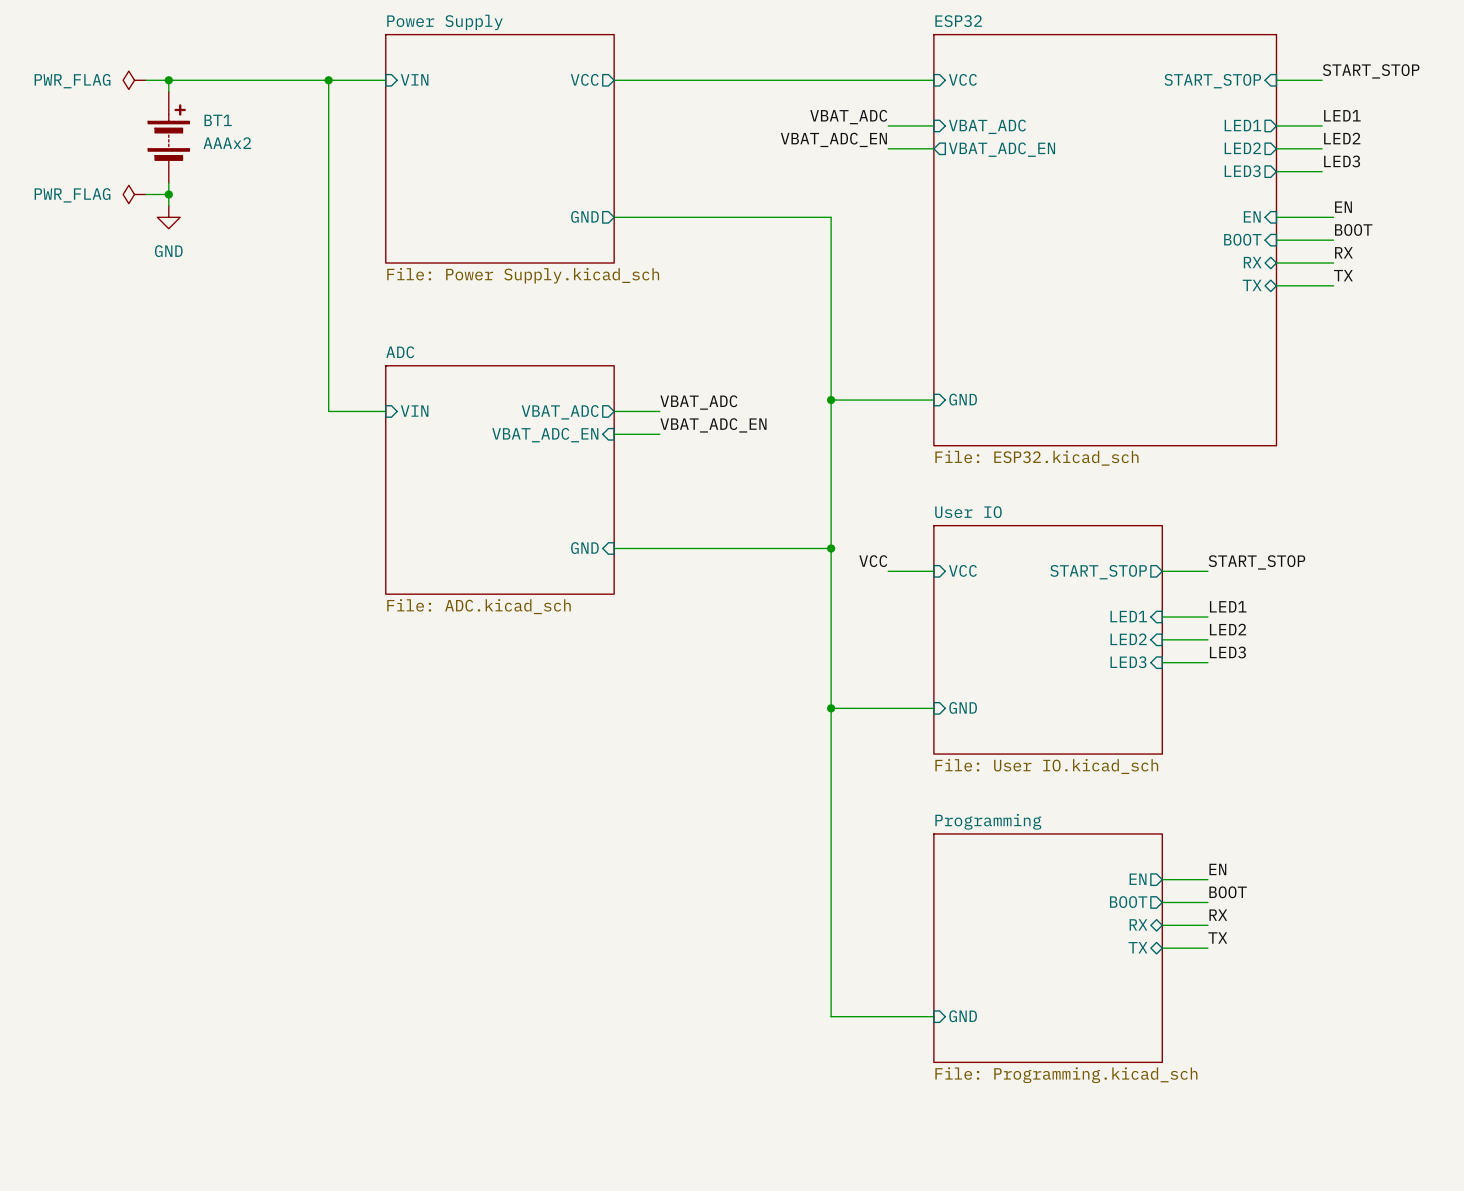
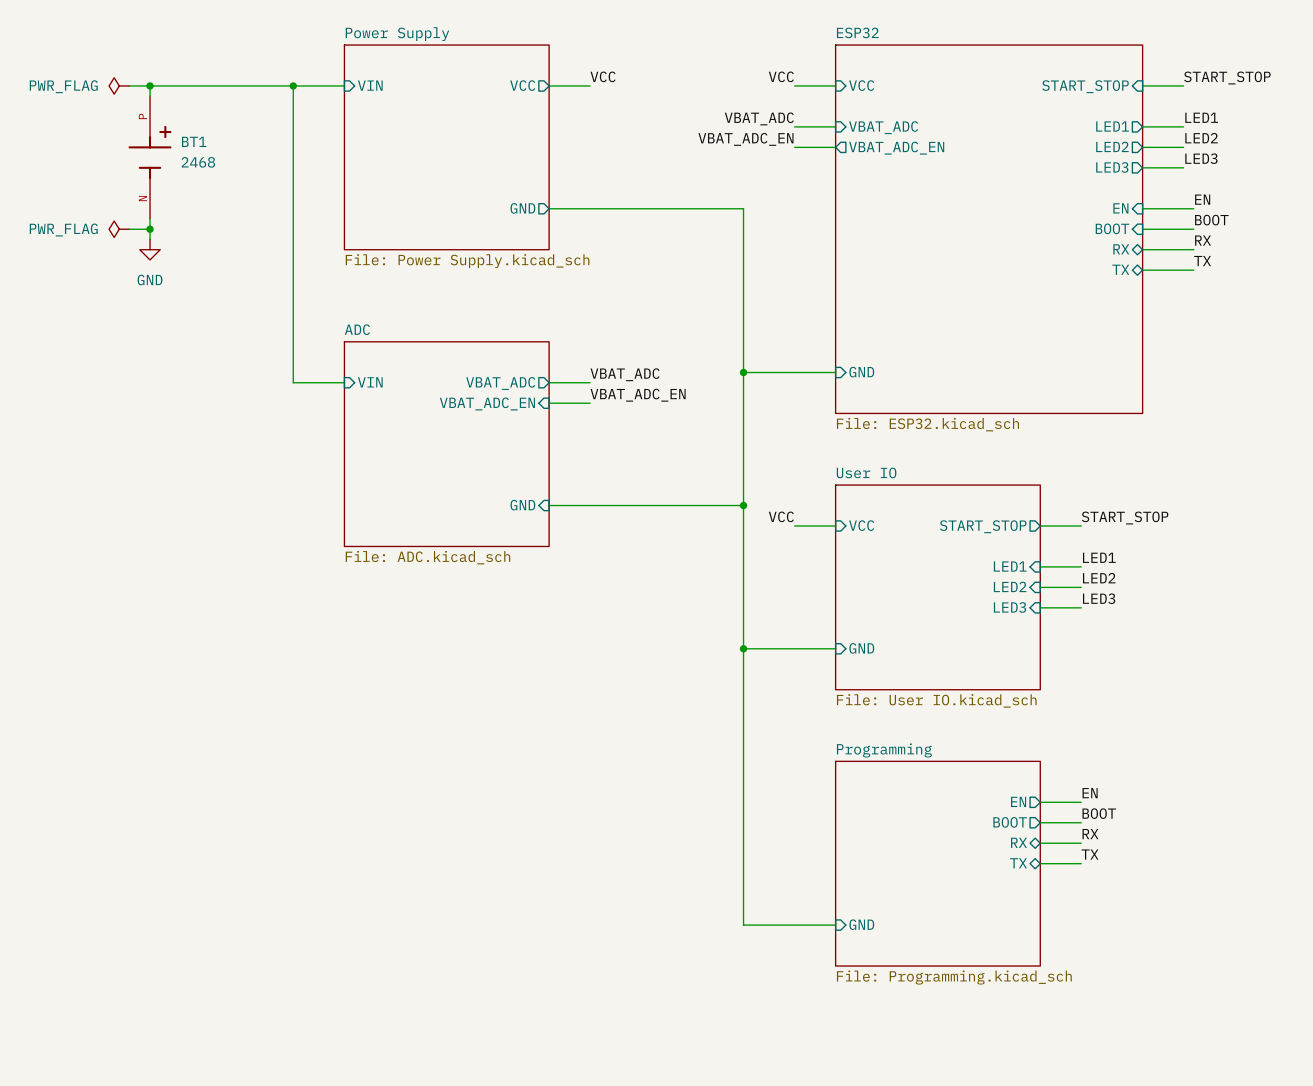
label: none -> VCC (603, 76)
label: none -> VCC (781, 76)
wire: (659, 80) (888, 80) -> none
BT1 symbol: [148, 91, 190, 184] -> [128, 96, 172, 220]
BT1 value: AAAx2 (227, 143) -> 2468 (198, 162)
power symbol position: PWR_FLAG (134, 194) -> PWR_FLAG (119, 229)
wire: (145, 194) (168, 194) -> (129, 229) (150, 229)
junction position: (168, 194) -> (150, 229)
power symbol position: GND (168, 217) -> GND (150, 249)

